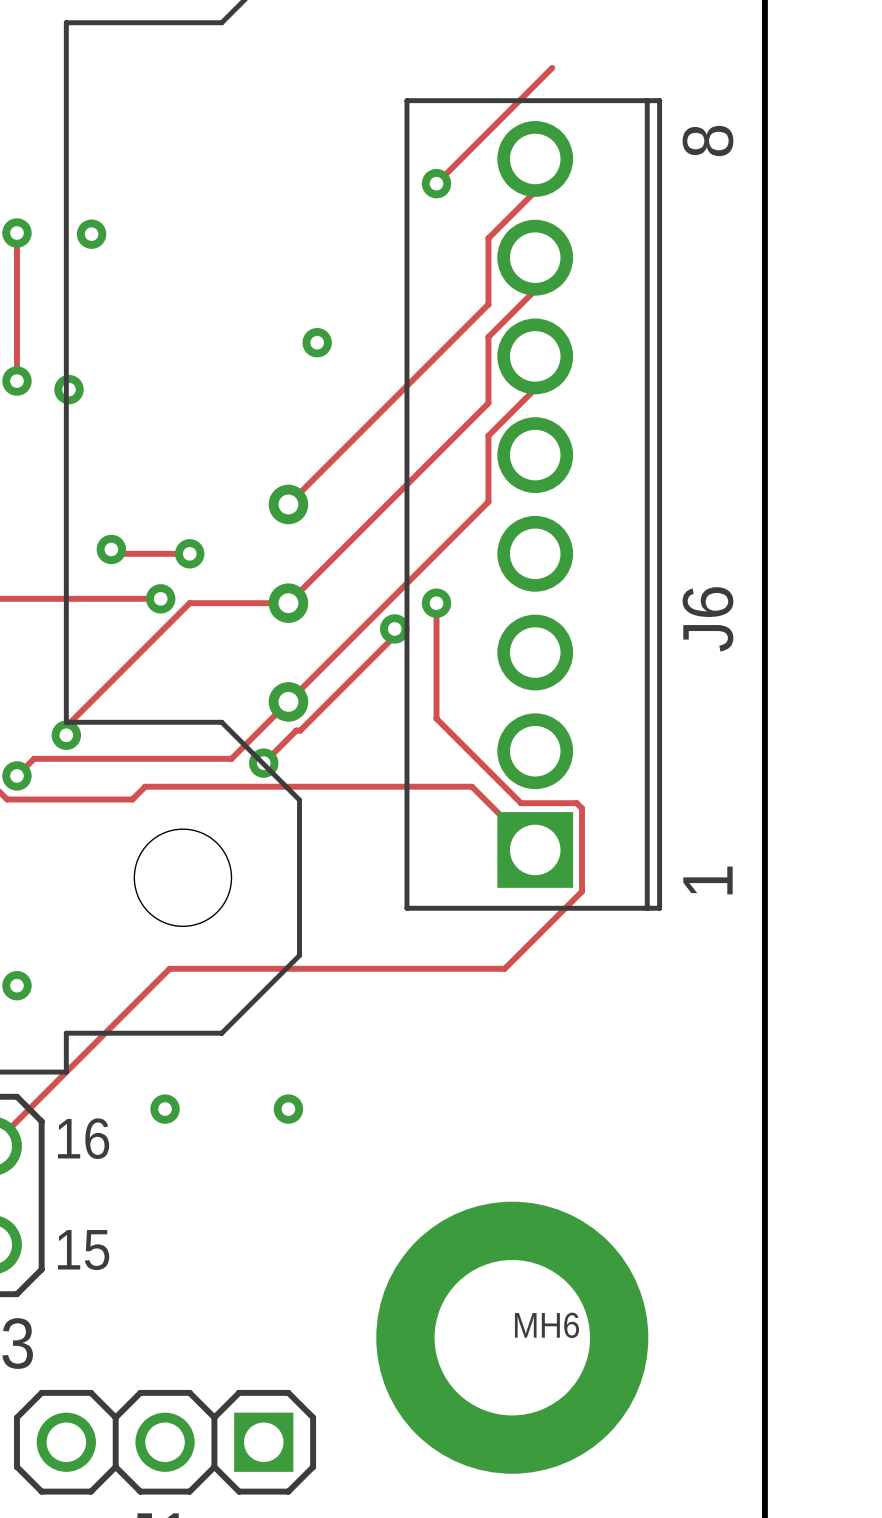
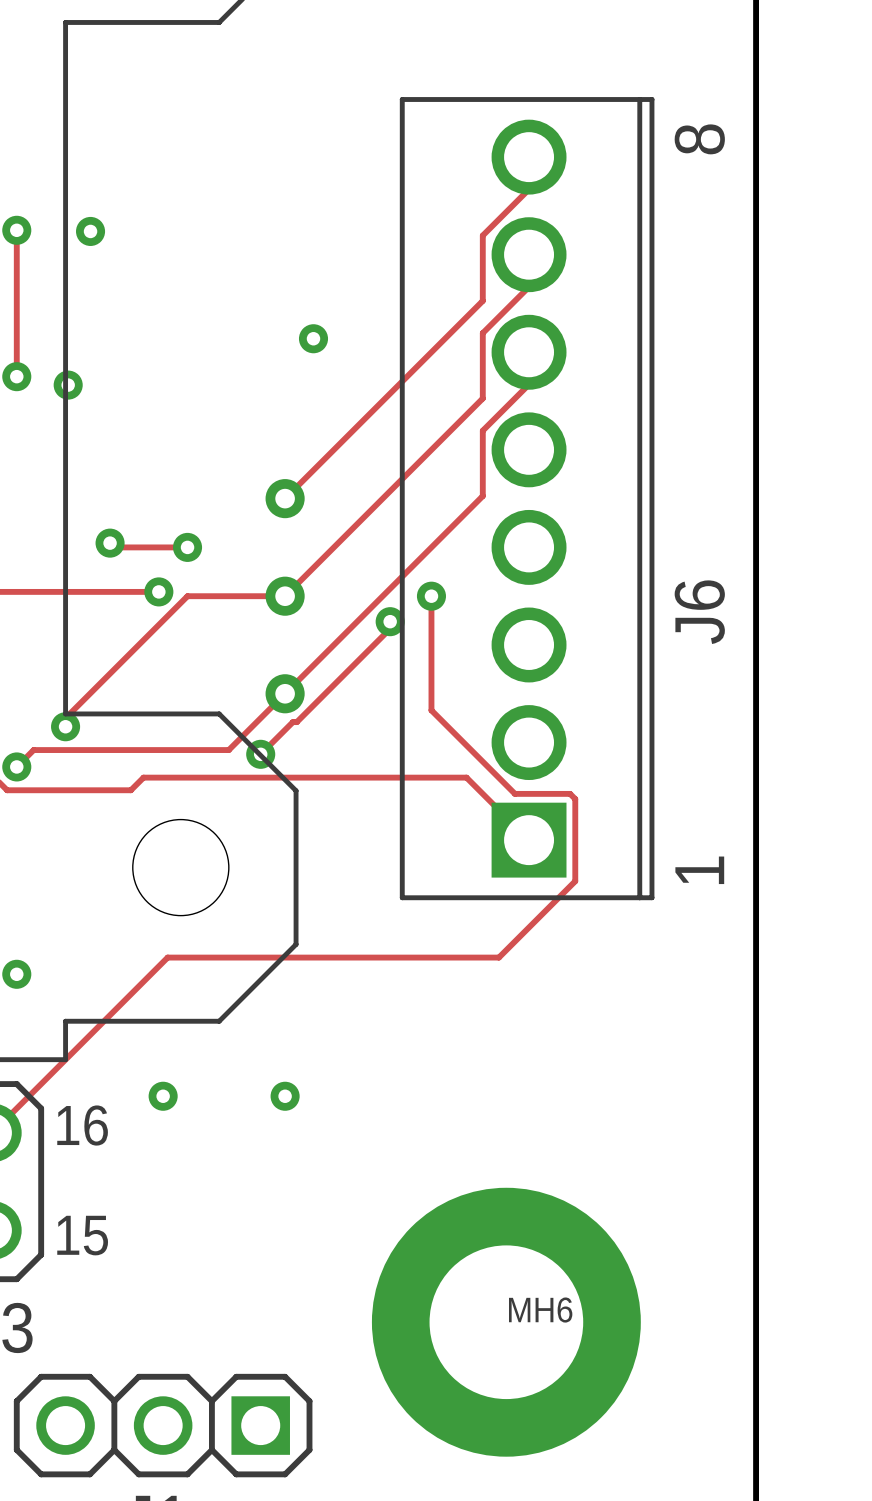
track: (552, 67) (436, 183) -> none
via: (436, 183) -> none

